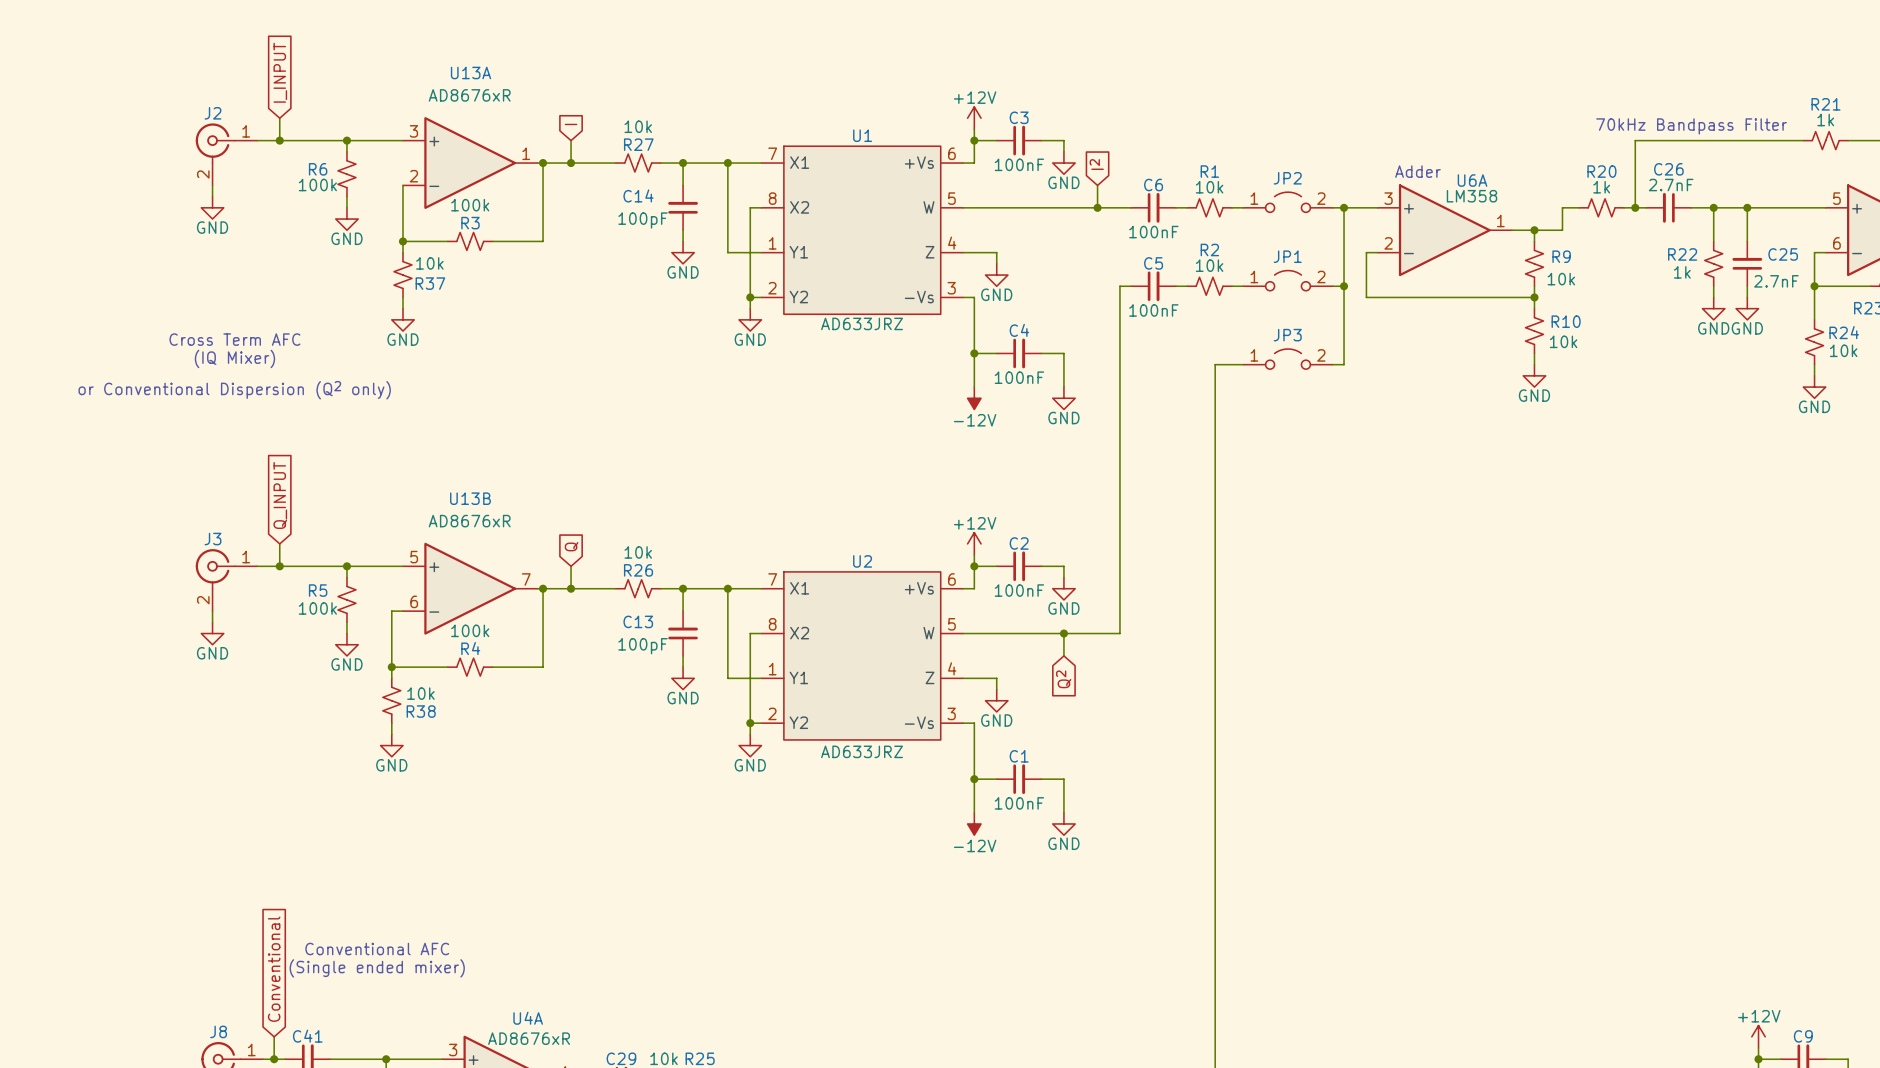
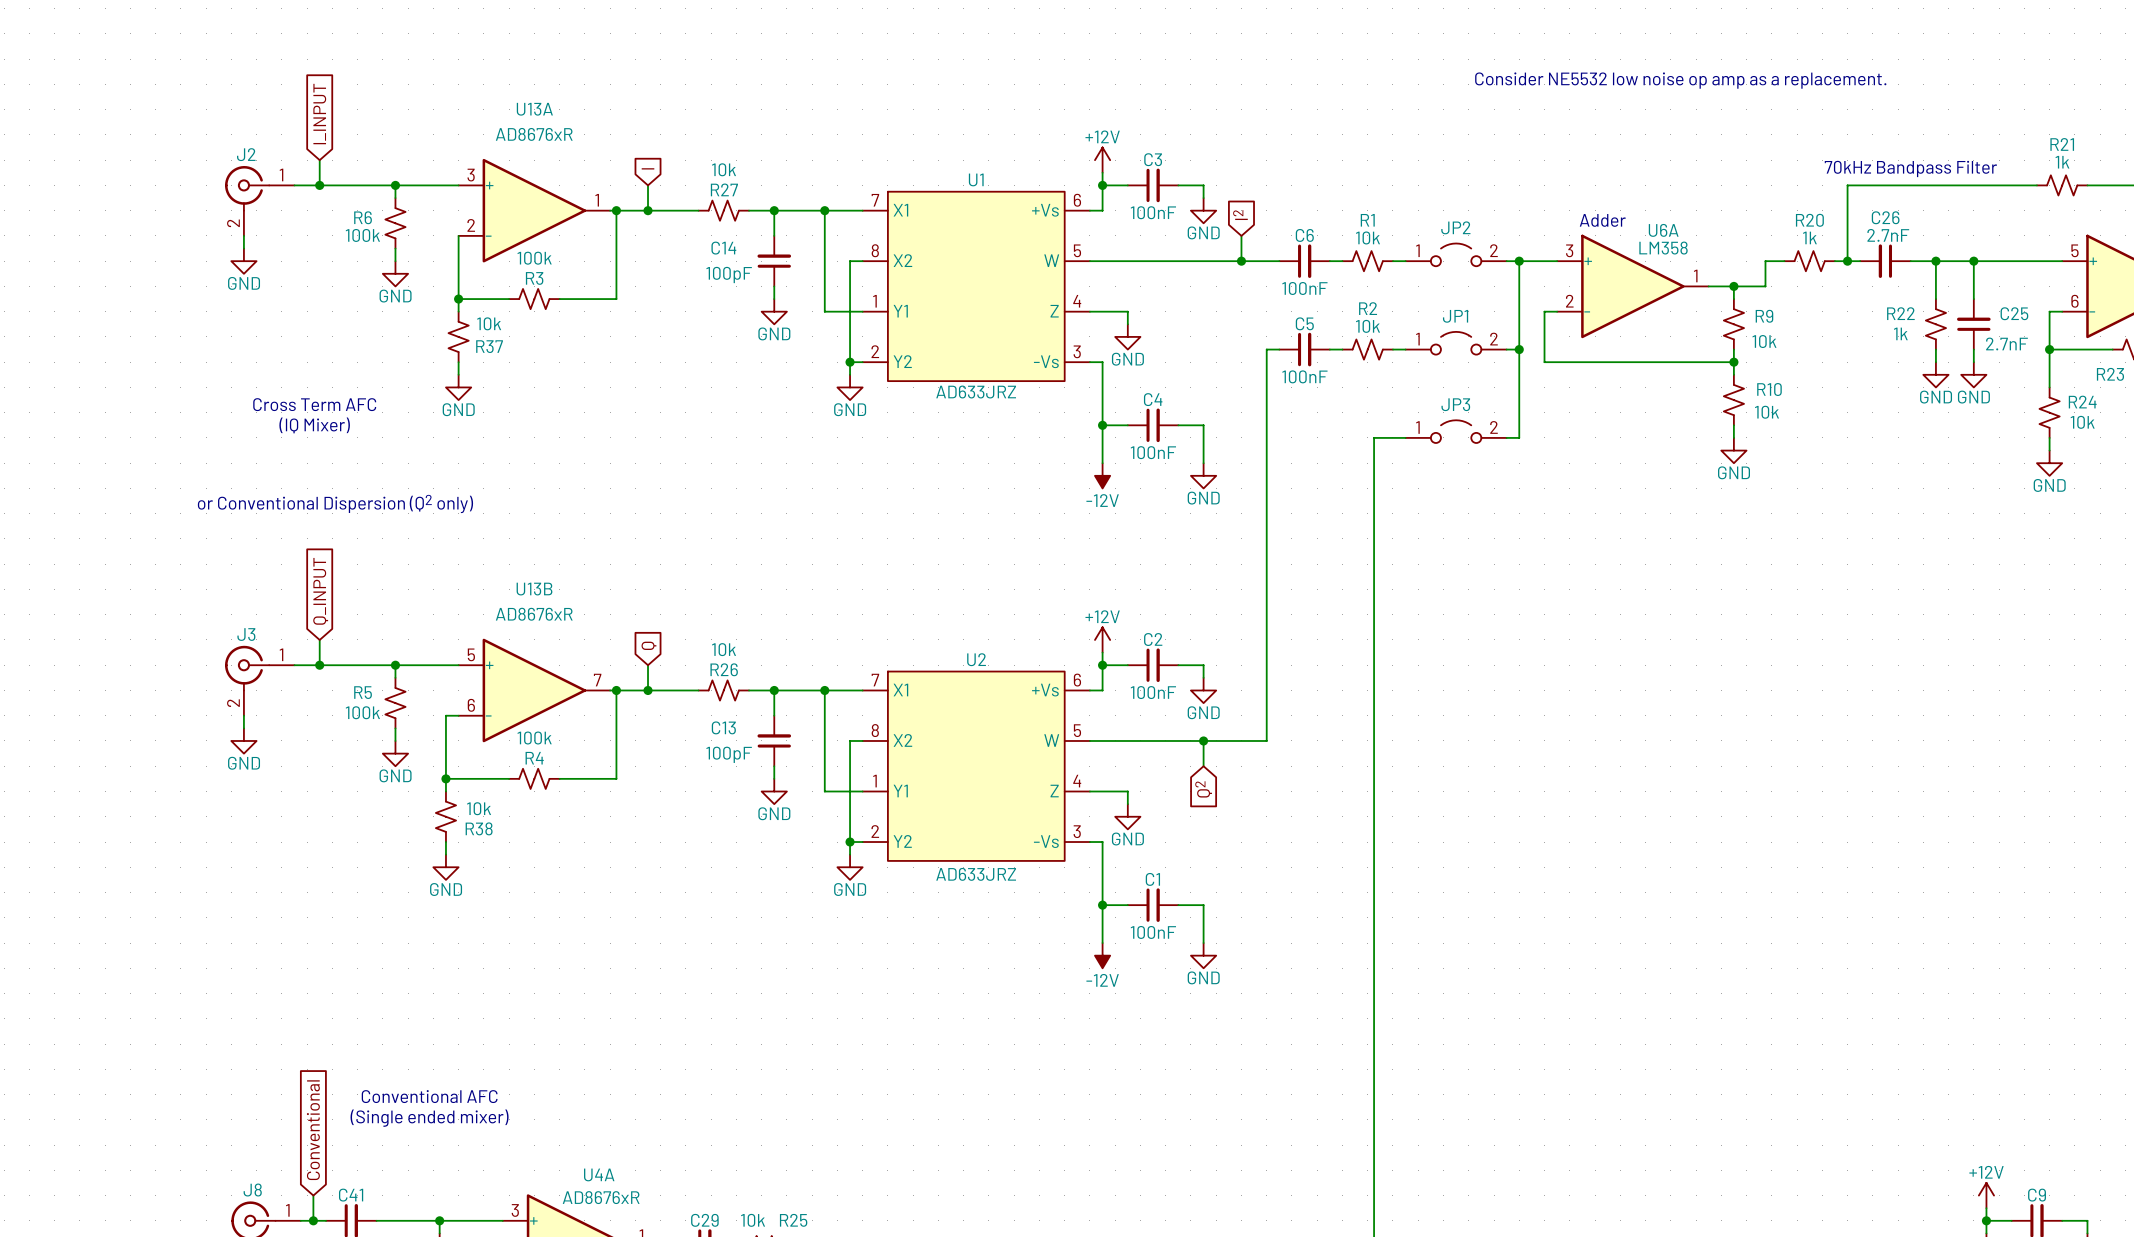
text: none -> Consider NE5532 low noise op amp as a replacement. (1680, 80)
text position: Cross Term AFC (234, 339) -> Cross Term AFC (314, 404)
text position: (IQ Mixer) (234, 358) -> (IQ Mixer) (314, 425)
text position: or Conventional Dispersion (Q2 only) (234, 390) -> or Conventional Dispersion (Q2 only) (335, 503)

